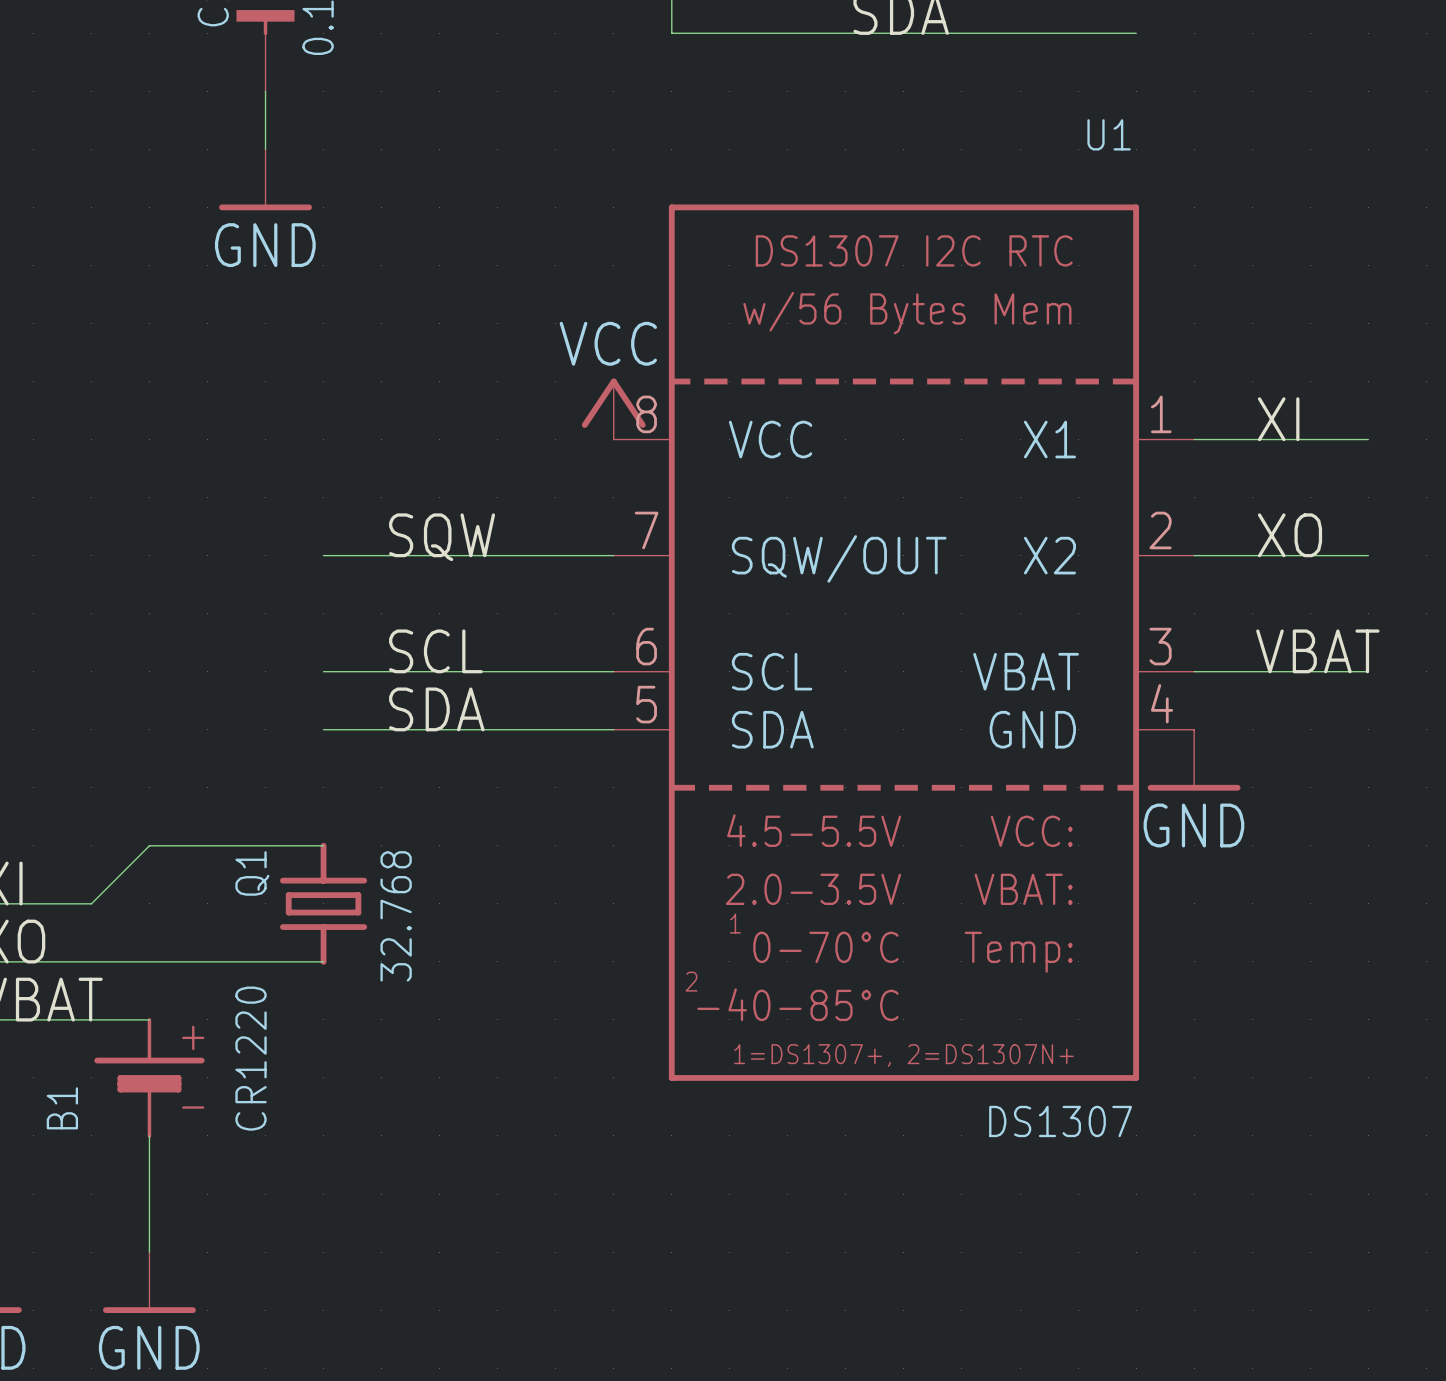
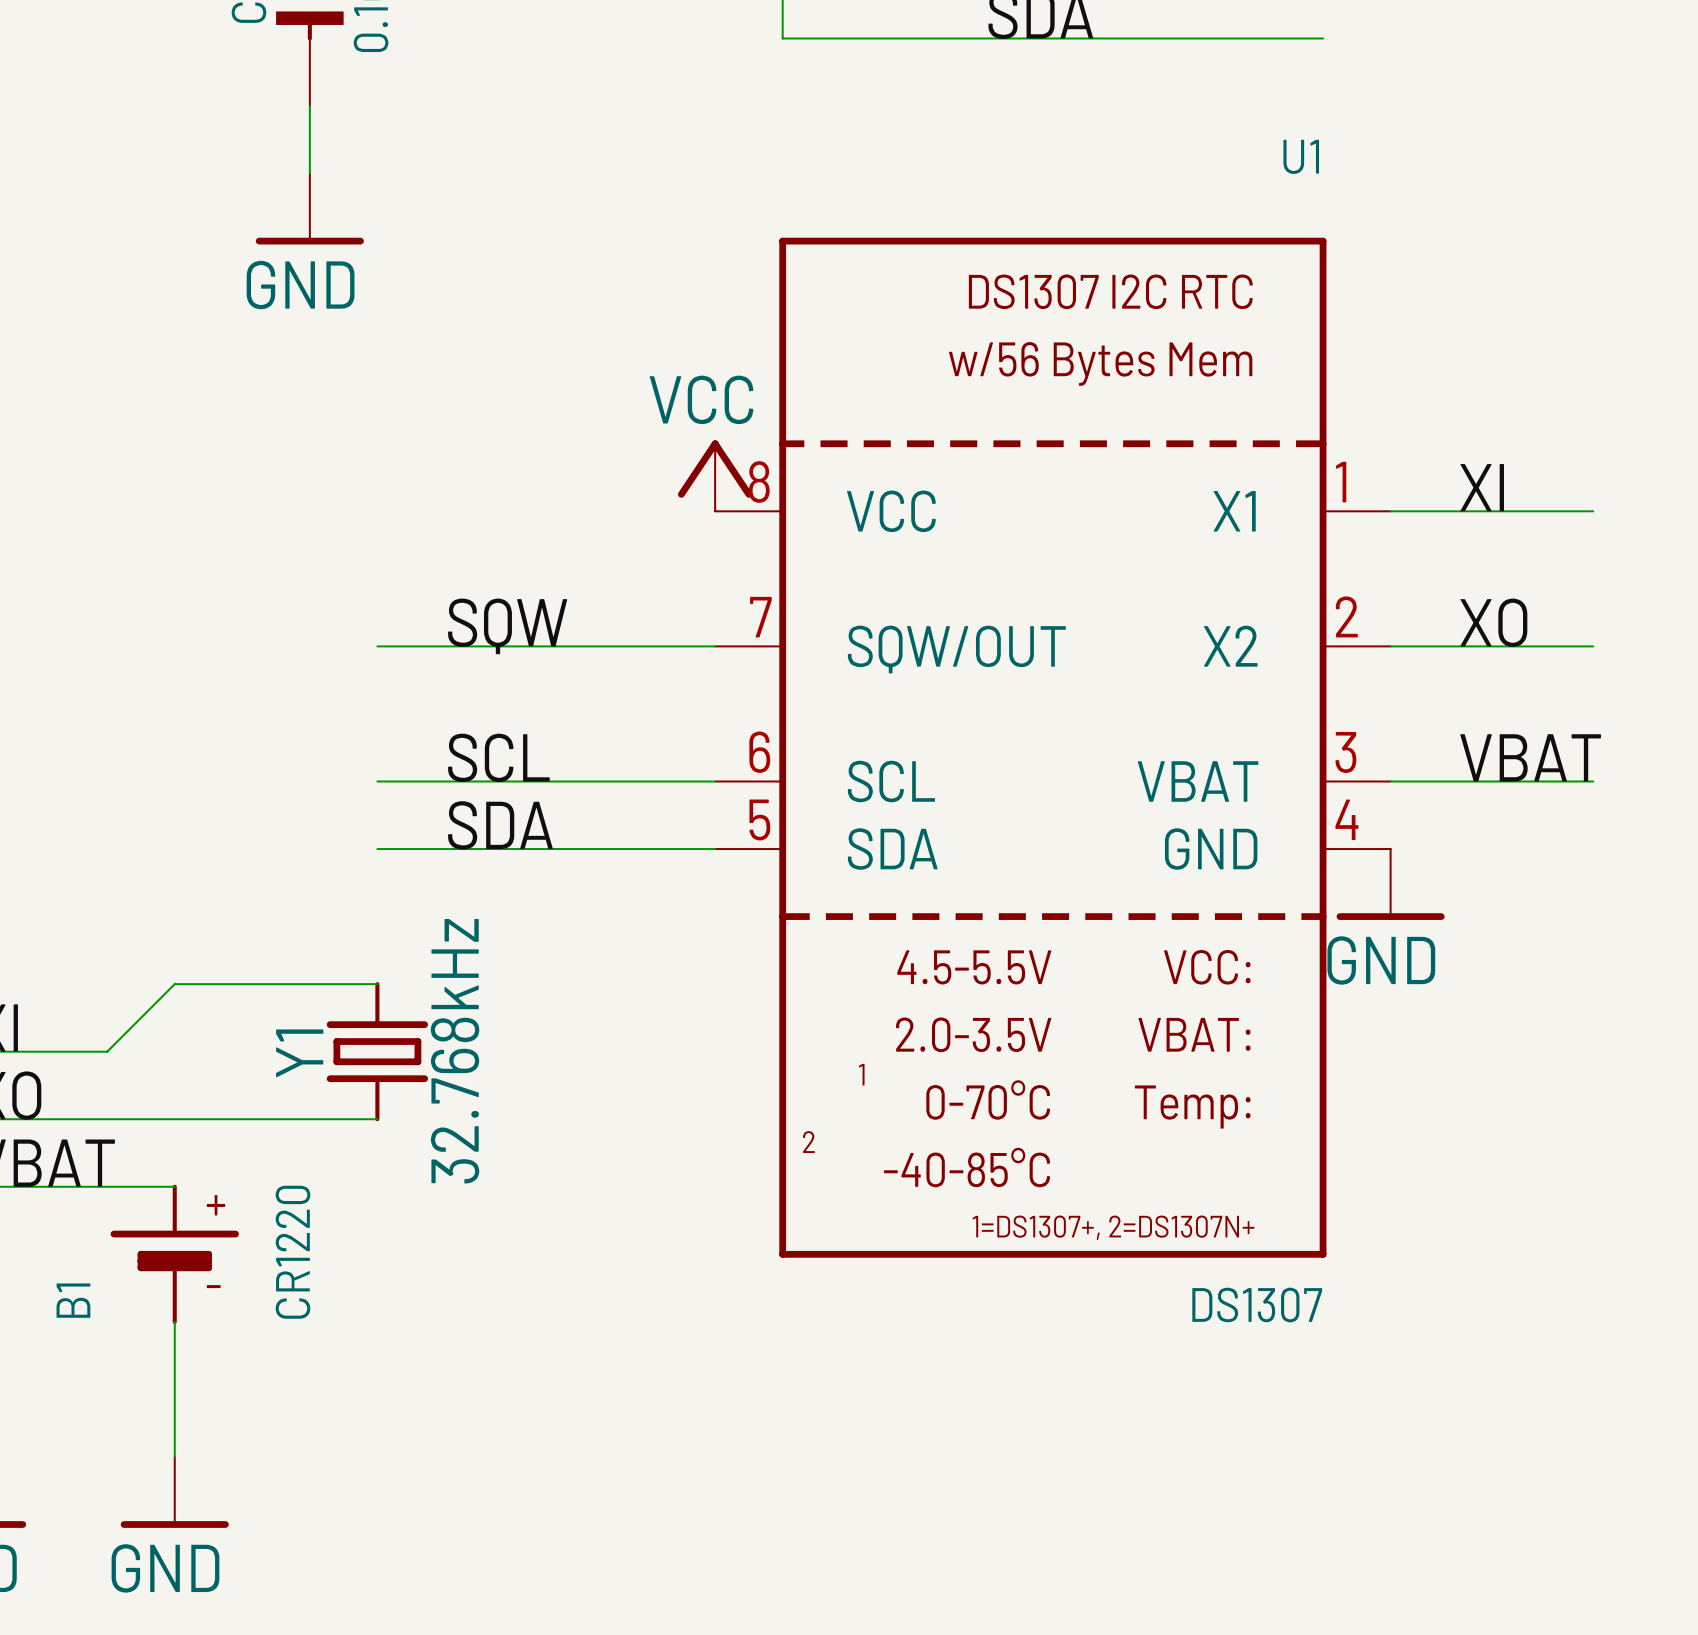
Q1: 32.768 (323, 903) -> none
Y1: none -> 32.768kHz (377, 1051)

